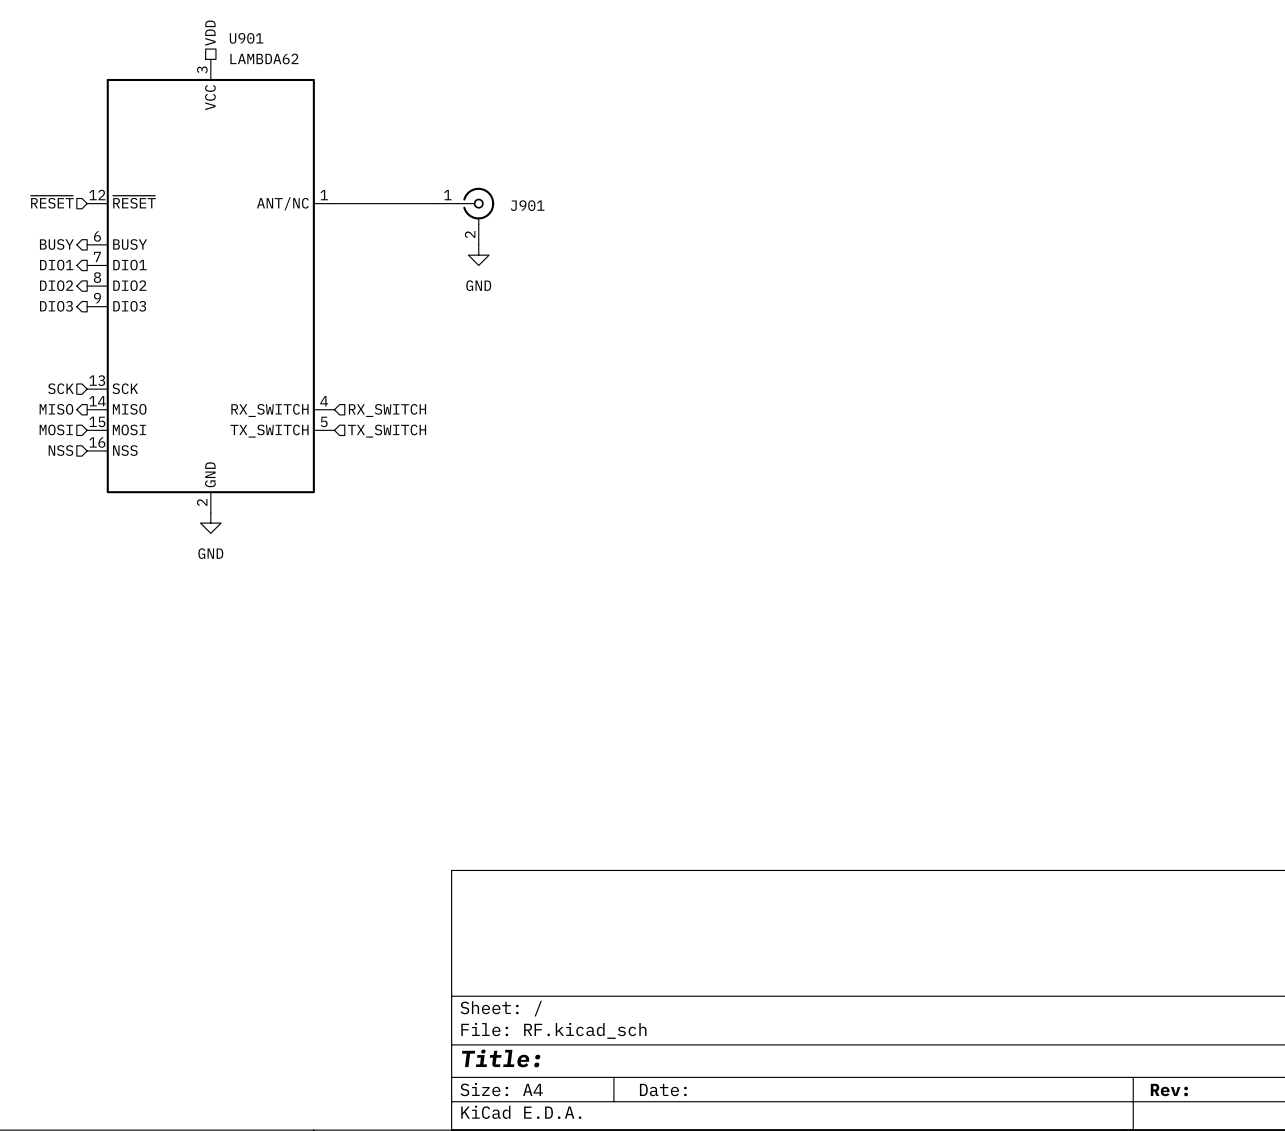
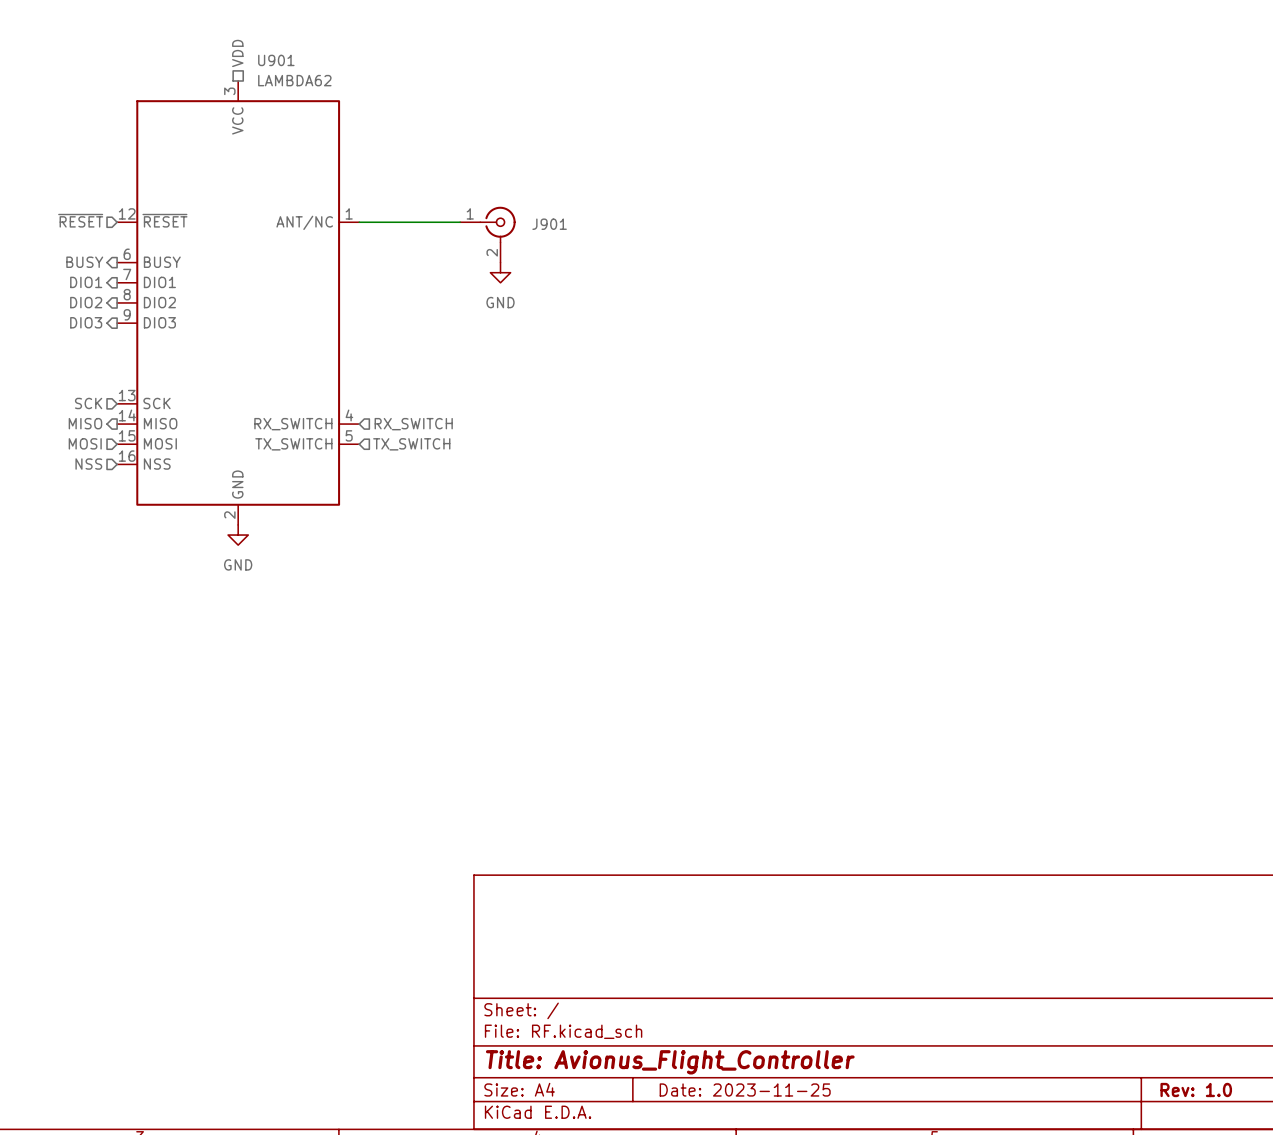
title block: Title: (501, 1058) -> Title: Avionus_Flight_Controller (670, 1062)
title block: Date: (663, 1090) -> Date: 2023-11-25 (745, 1090)
title block: Rev: (1169, 1090) -> Rev: 1.0 (1196, 1090)

